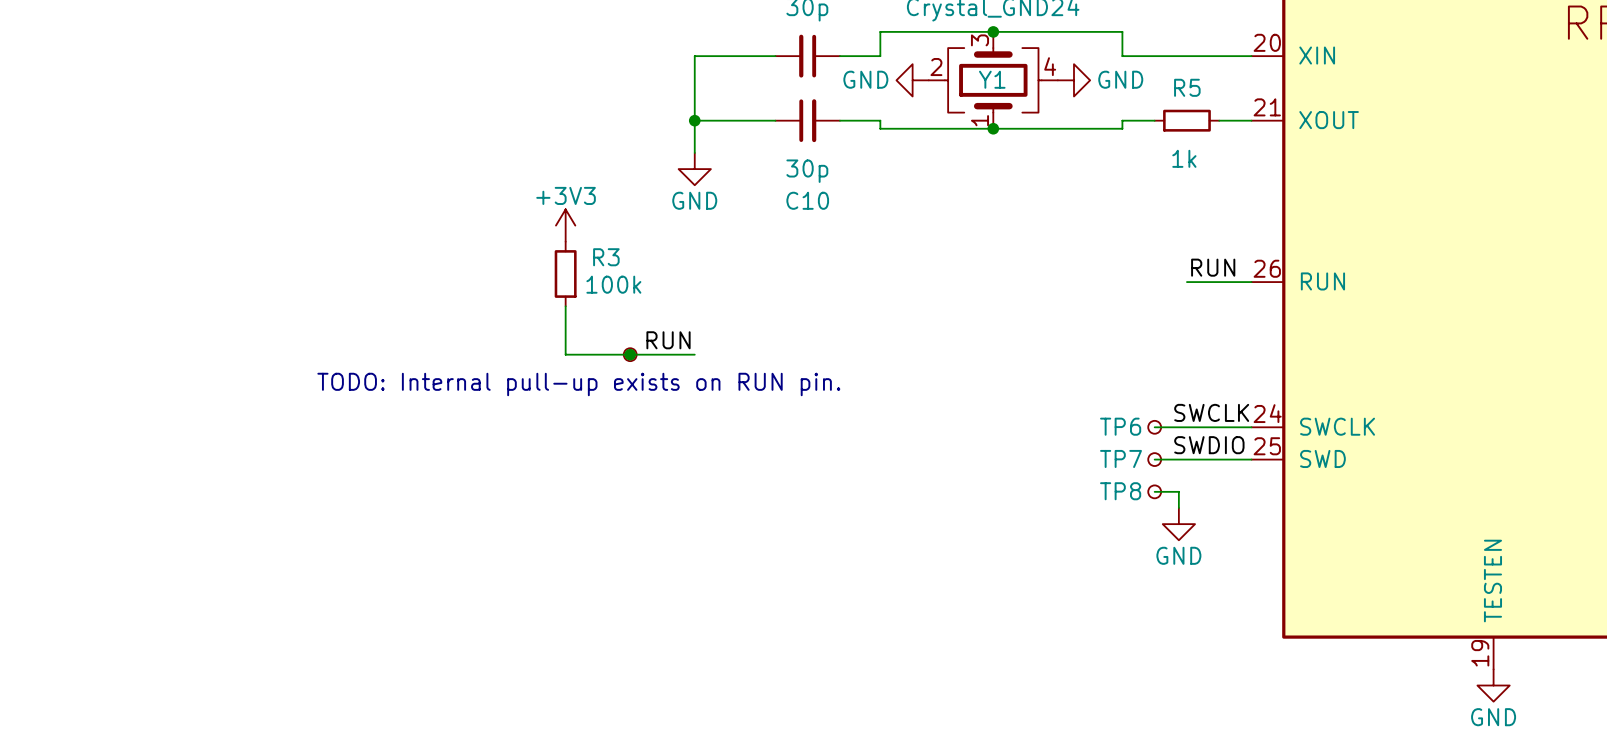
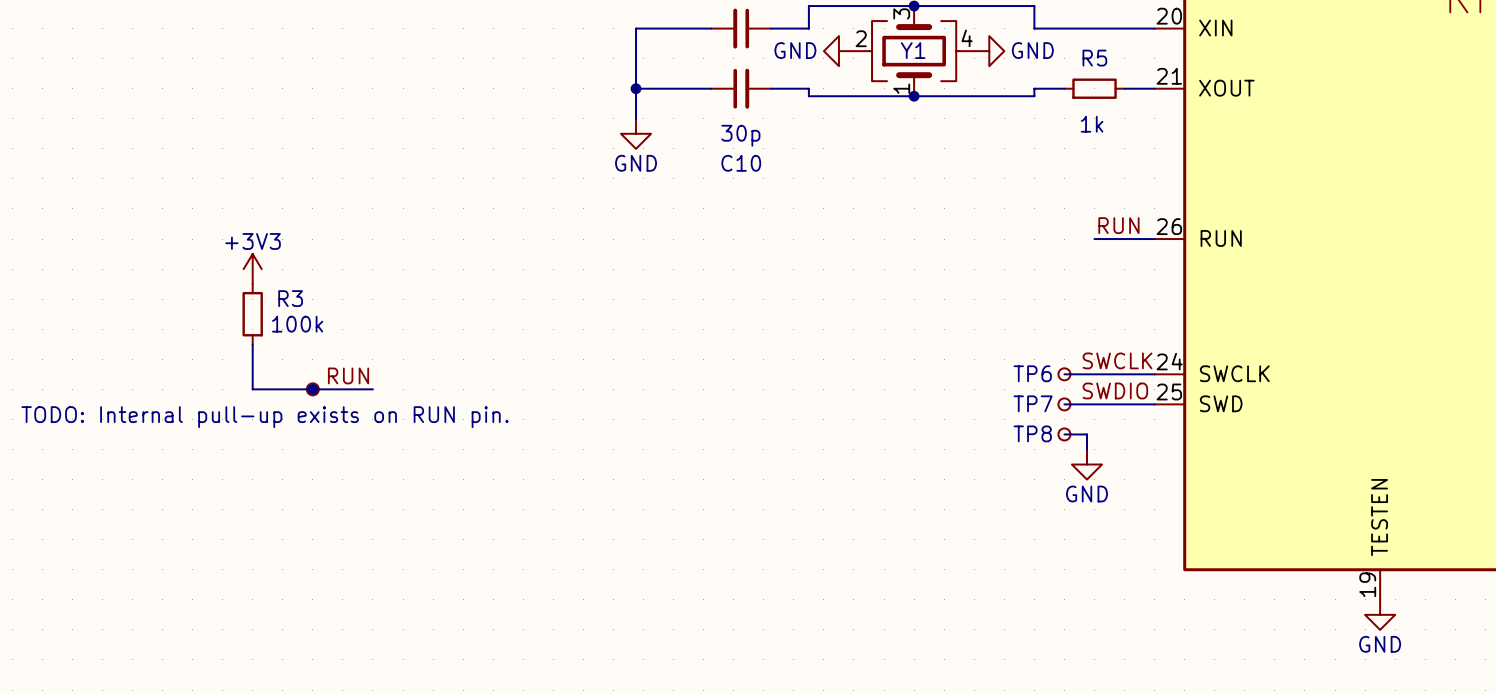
power symbol position: +3V3 (565, 225) -> +3V3 (252, 269)
R3 position: (565, 273) -> (252, 314)
wire: (565, 306) (565, 354) (694, 354) -> (252, 344) (252, 389) (372, 389)
label position: RUN (668, 340) -> RUN (348, 375)
junction: (630, 354) -> none
part position: (630, 354) -> (312, 389)
text position: TODO: Internal pull-up exists on RUN pin. (578, 384) -> TODO: Internal pull-up exists on RUN pin. (264, 417)
junction: none -> (312, 389)

